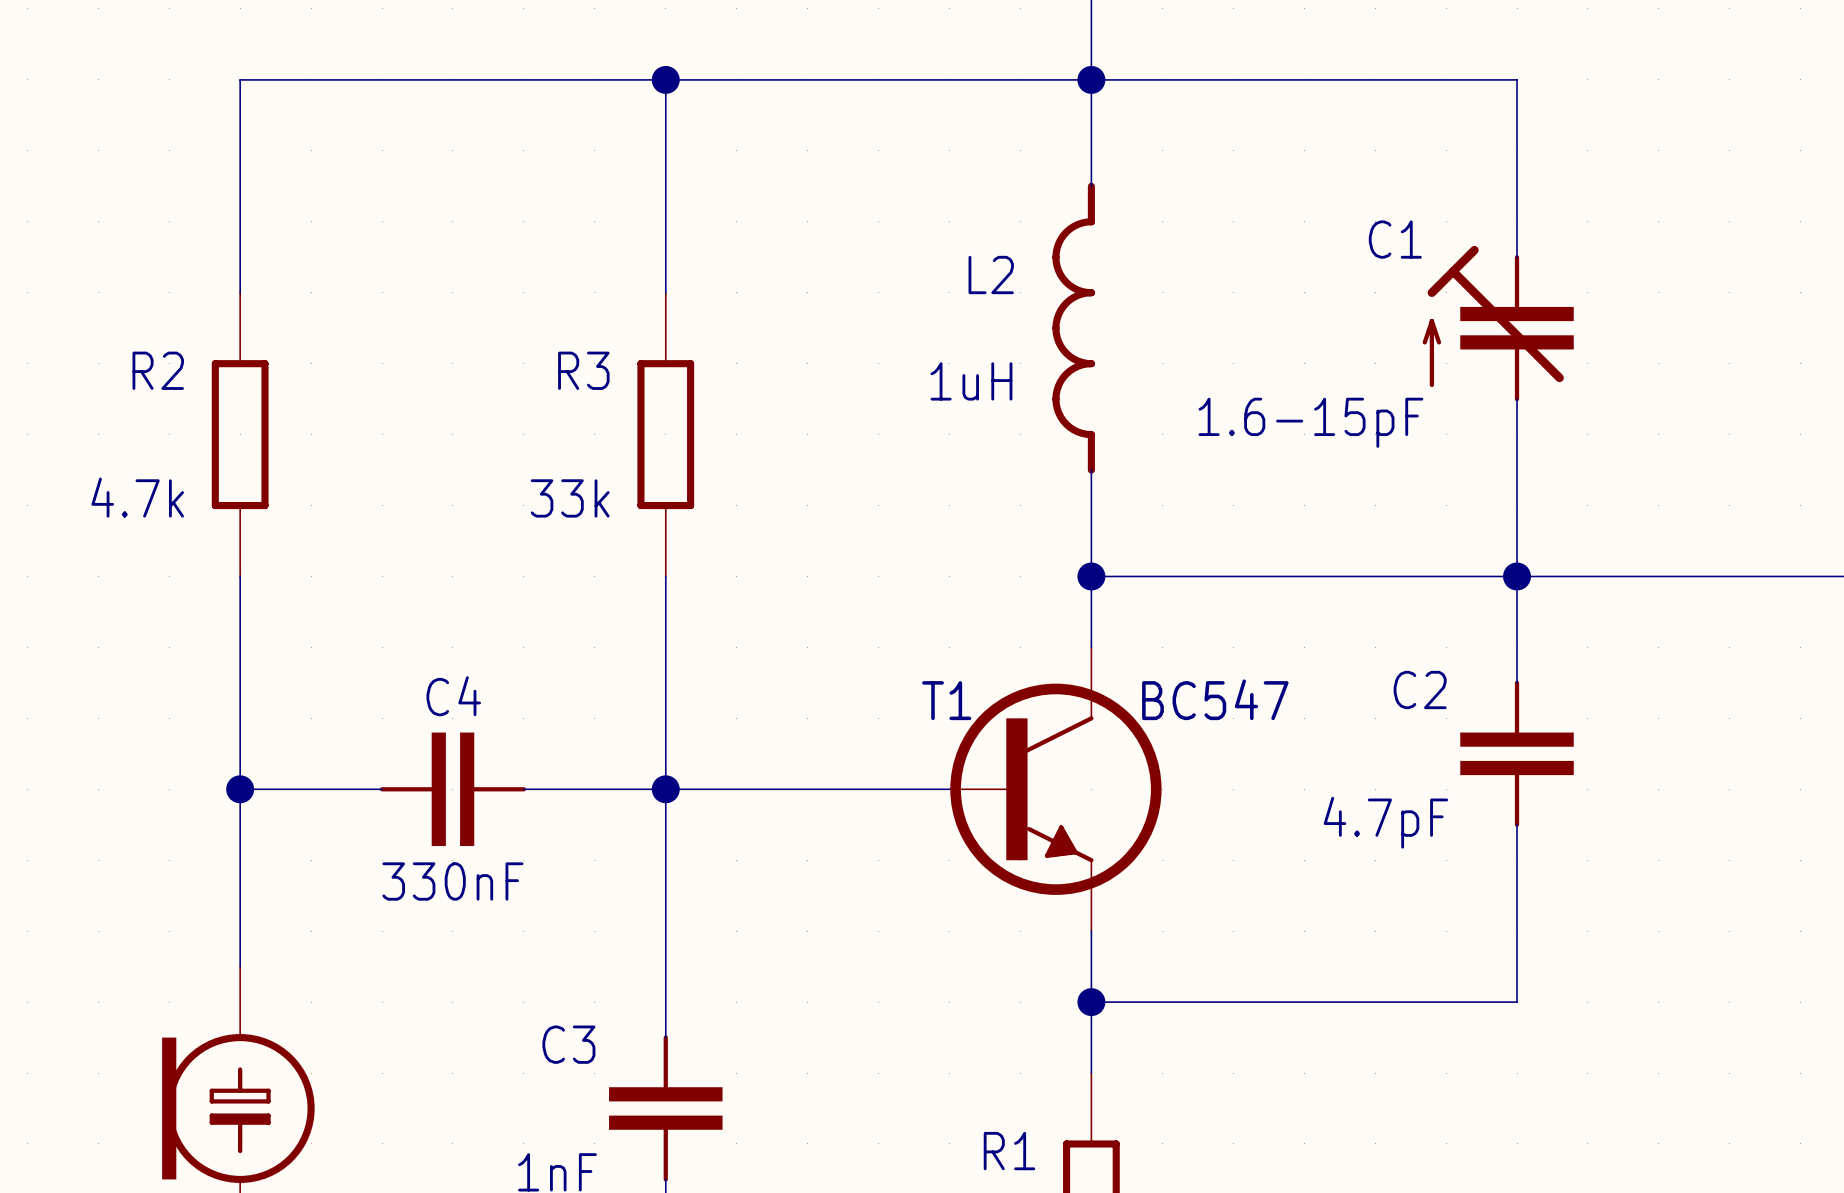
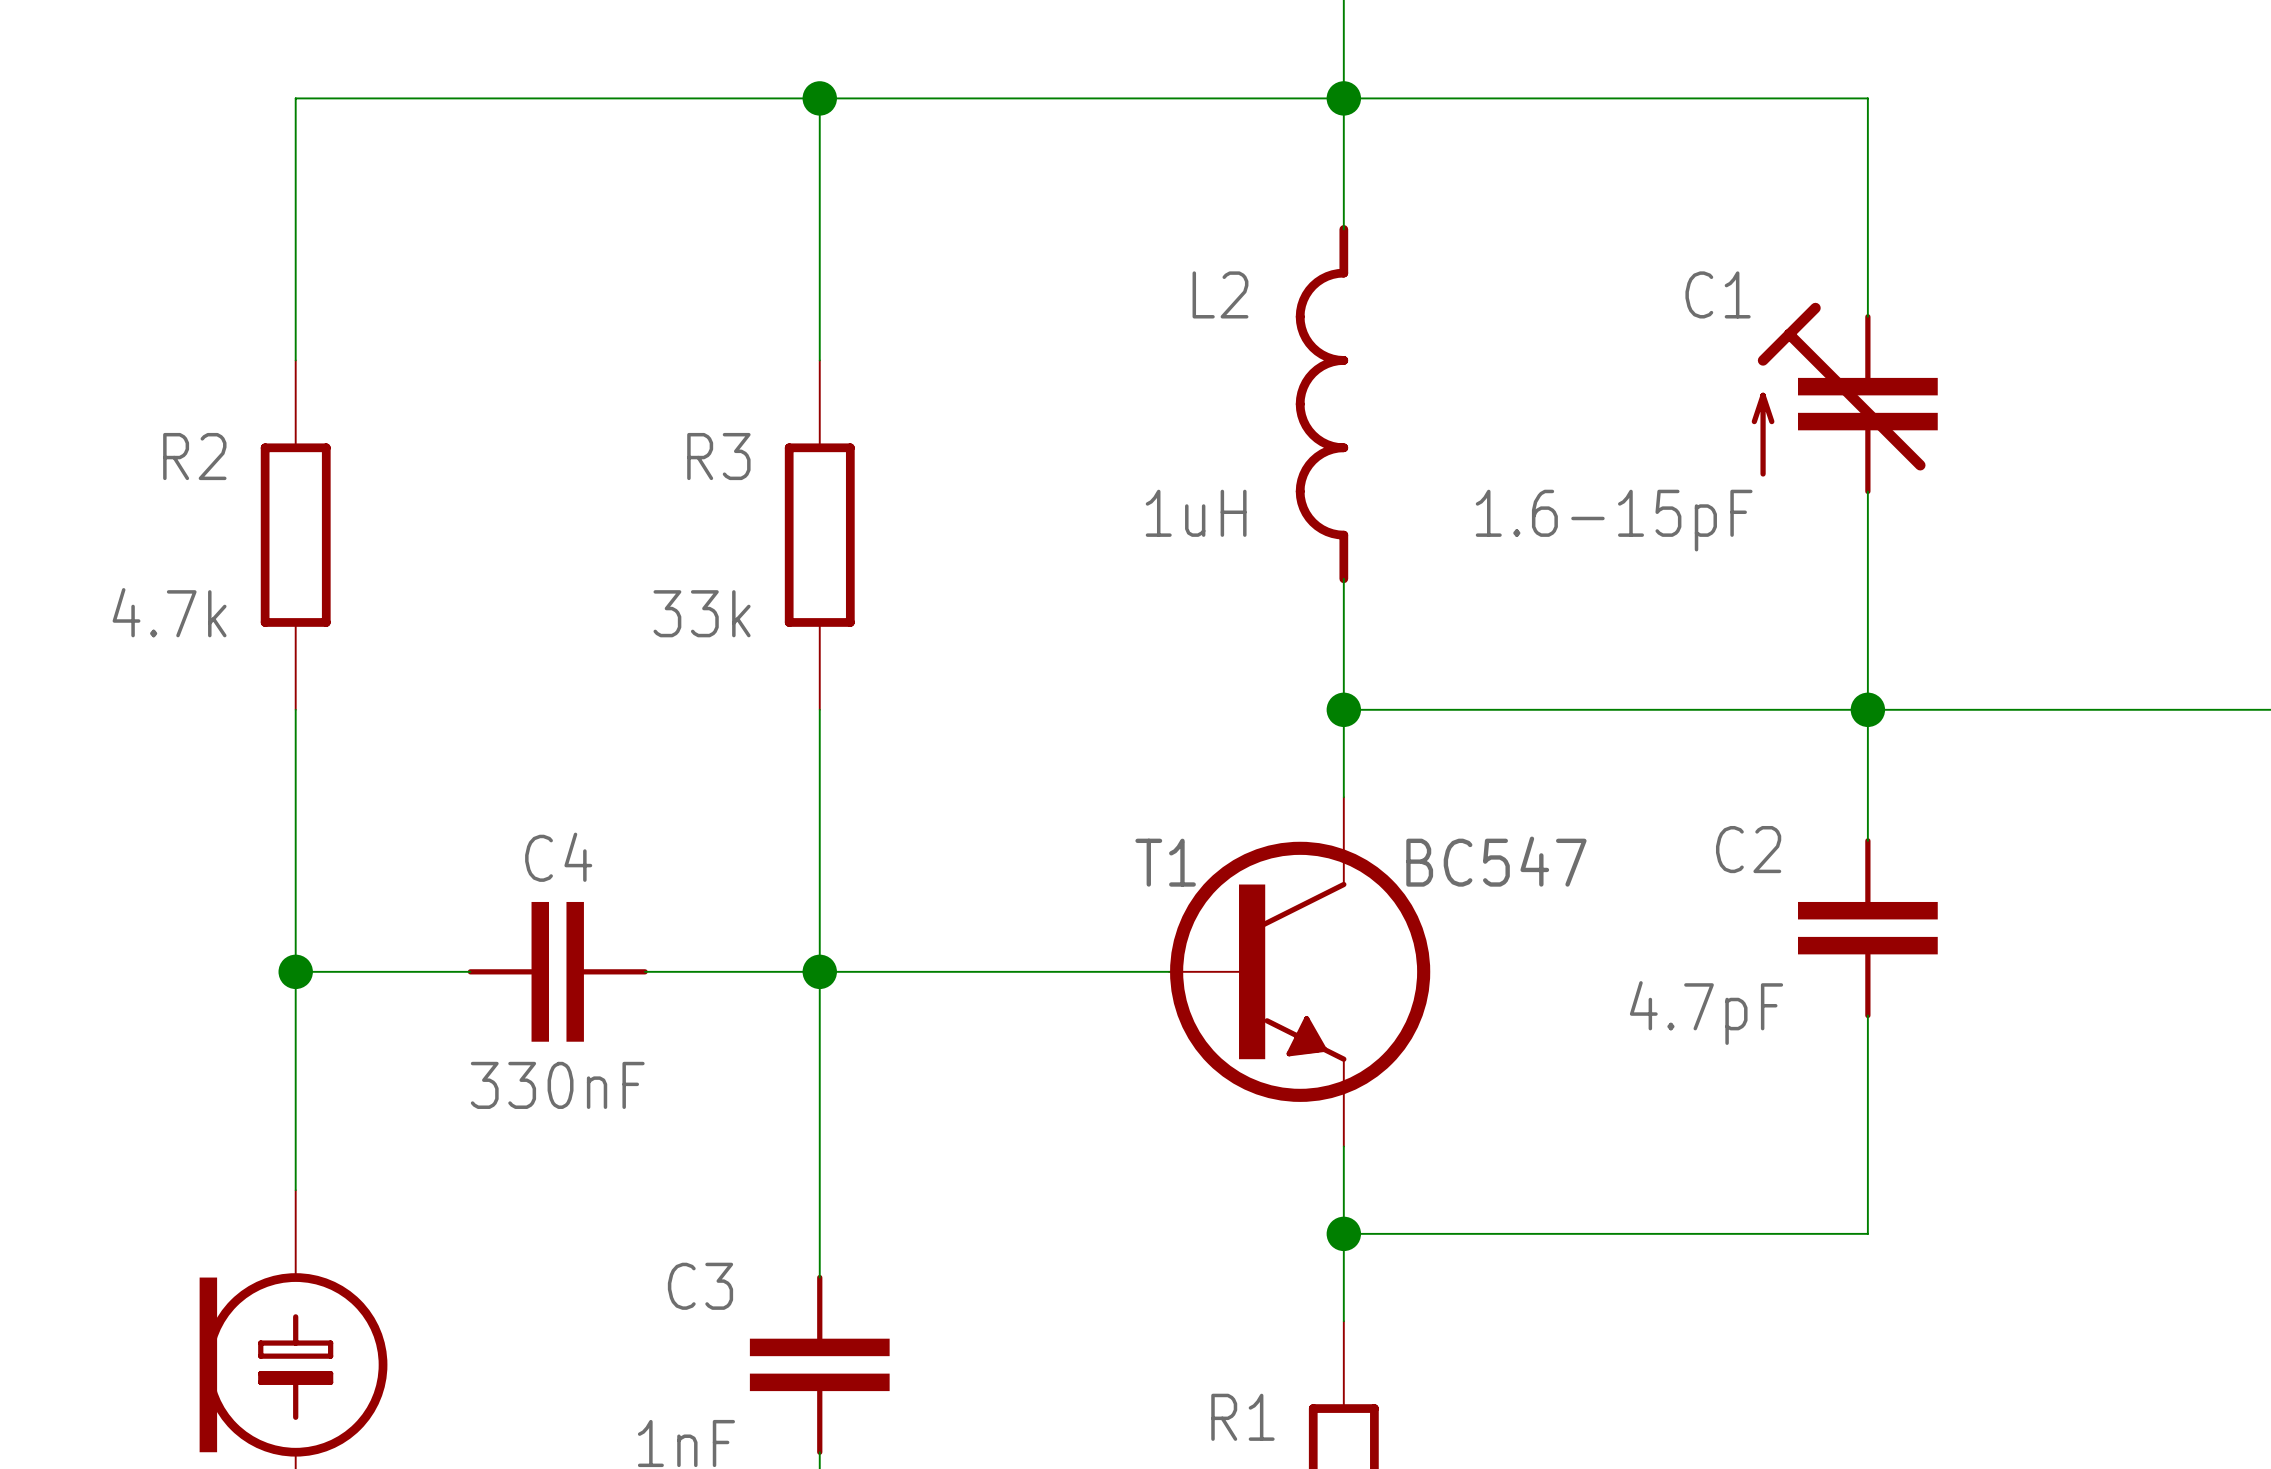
L2 name position: L2 (991, 275) -> L2 (1220, 294)
L2 value position: 1uH (971, 381) -> 1uH (1196, 513)

